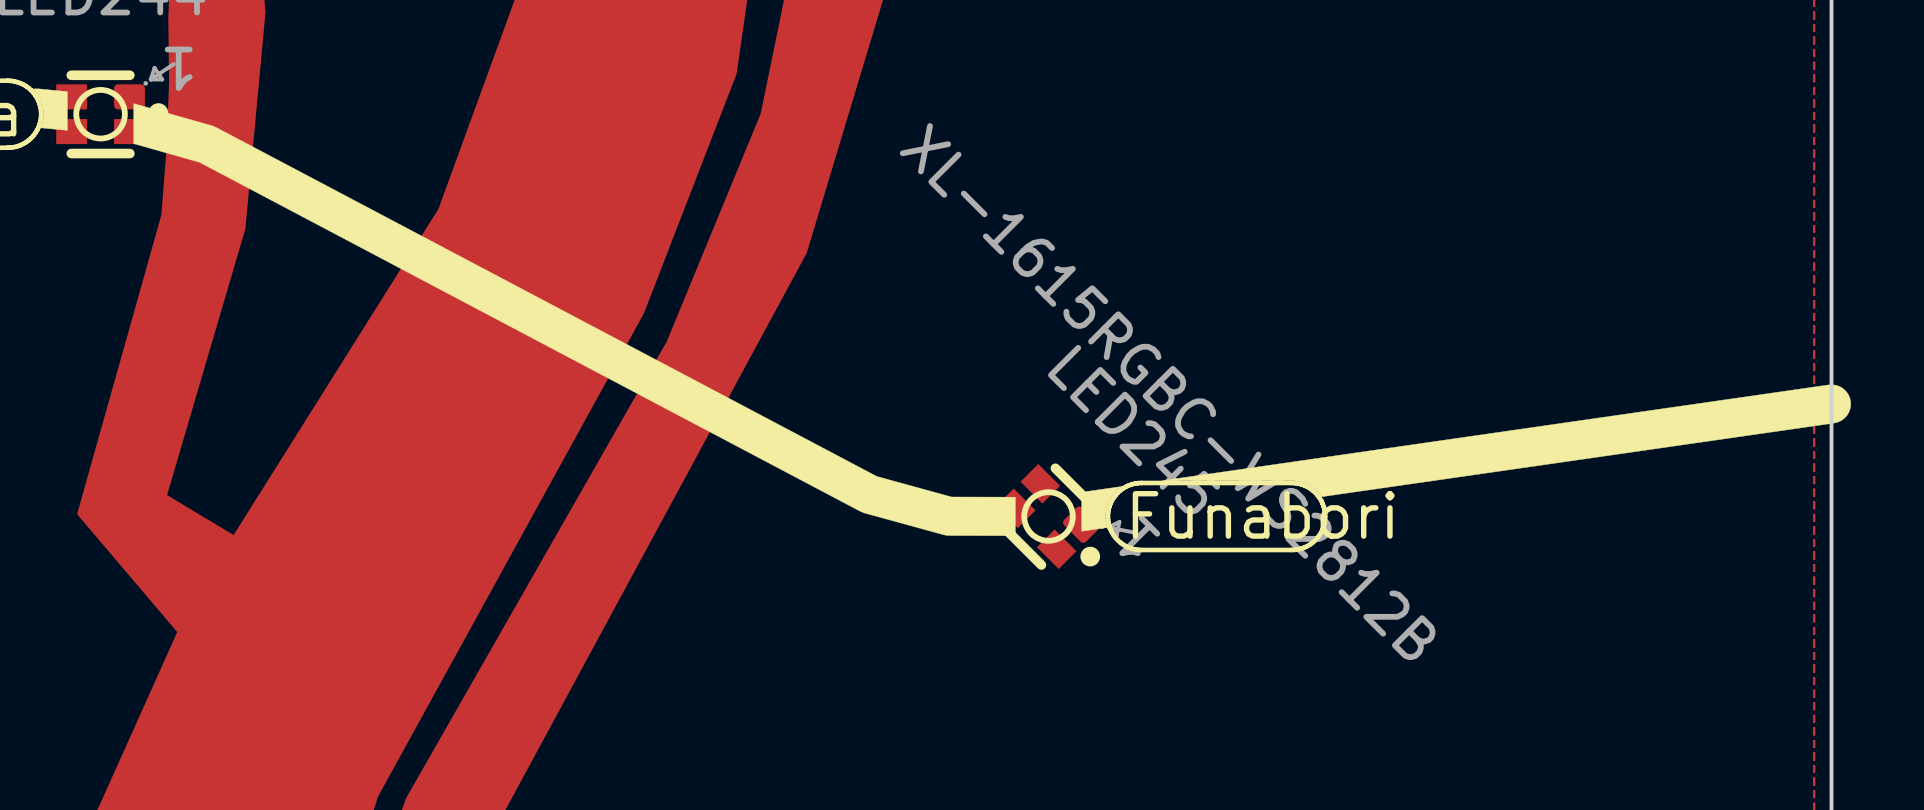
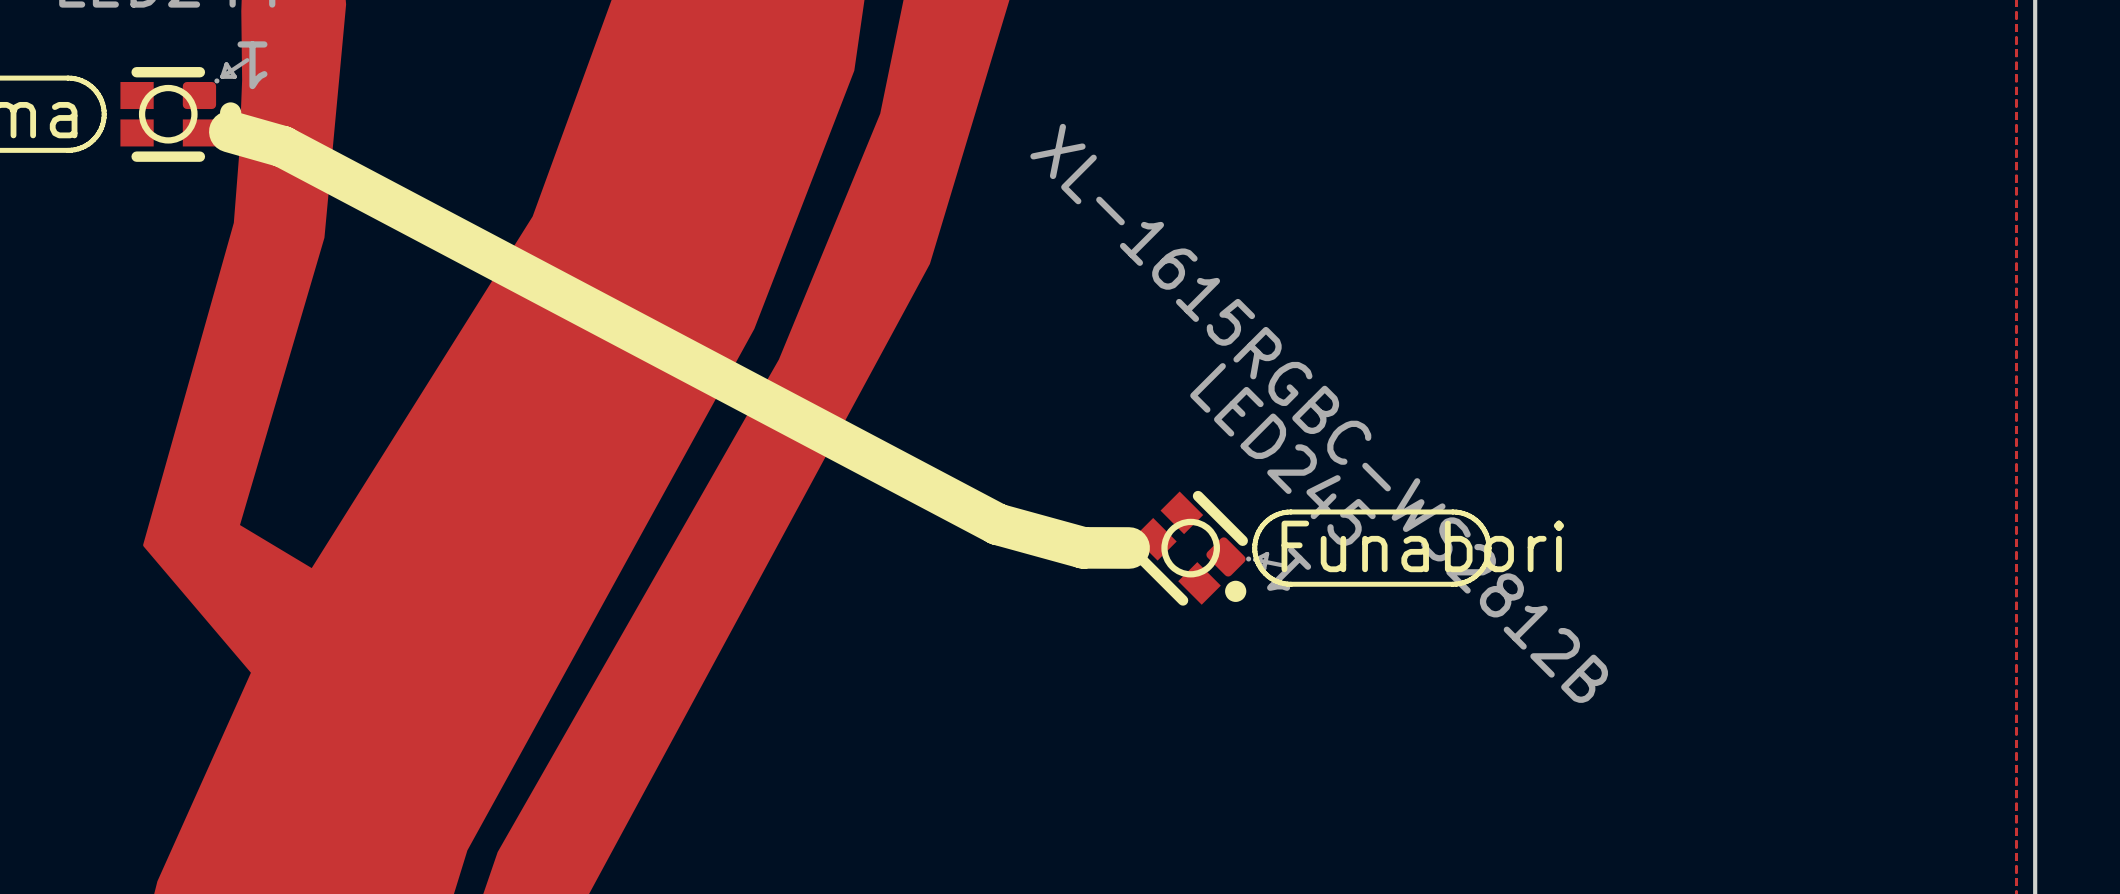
drawing: [32, 88, 68, 131] -> none
drawing: [133, 103, 1016, 536] -> none
line: none -> (229, 131) (282, 146) (997, 524) (1083, 547) (1129, 547)
drawing: [1081, 384, 1851, 532] -> none

